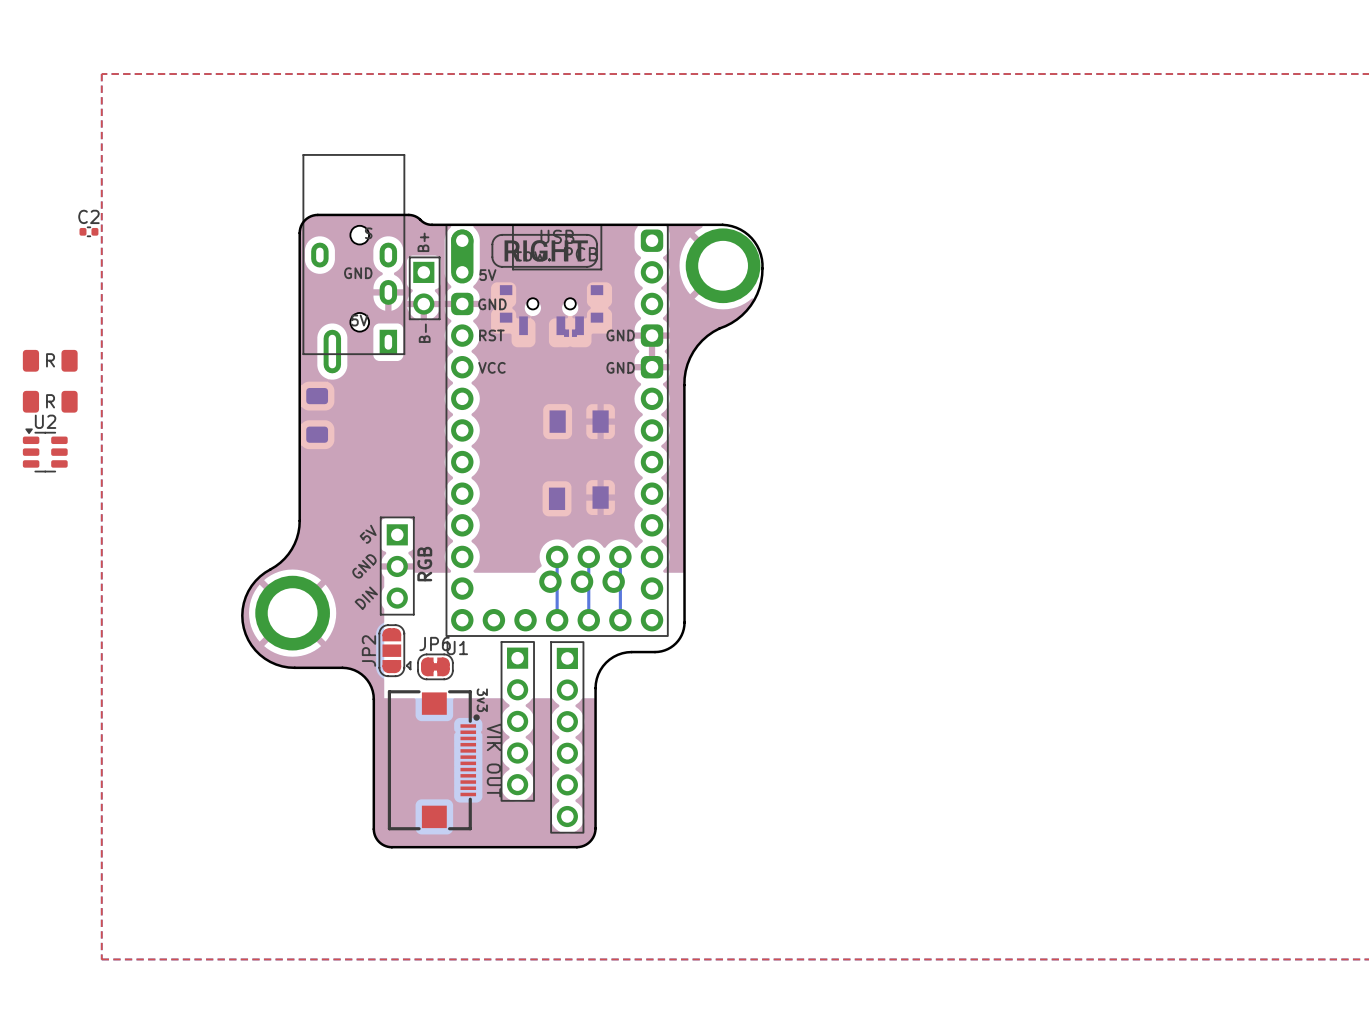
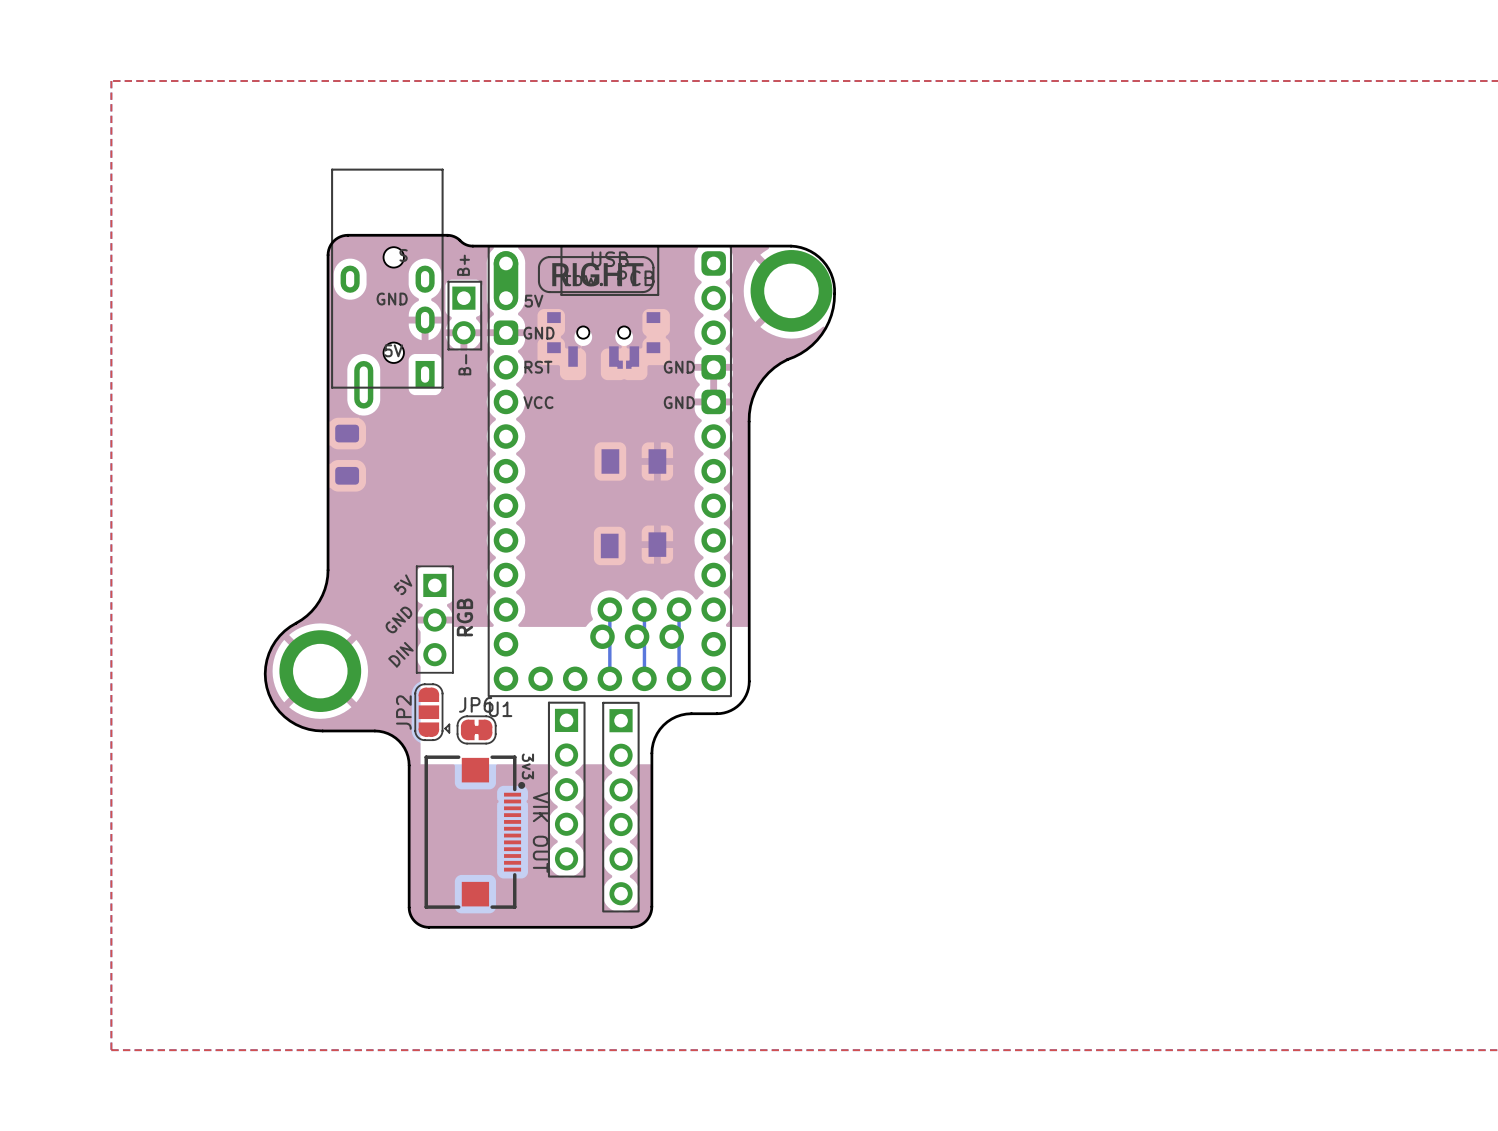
C2: (88, 231) -> none
part: (50, 360) -> none
part: (50, 401) -> none
U2: (45, 450) -> none

